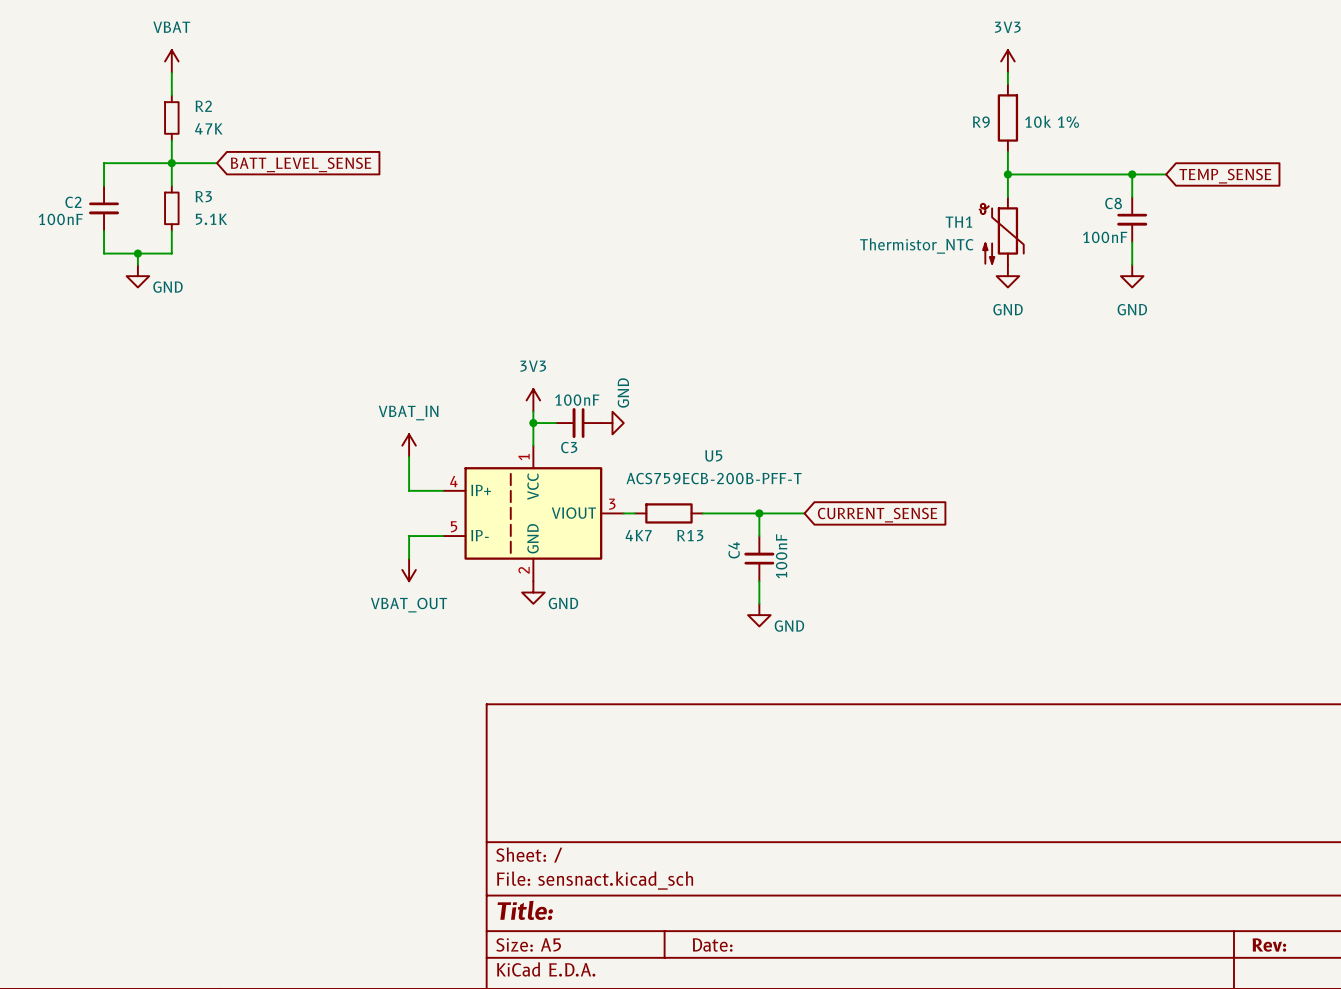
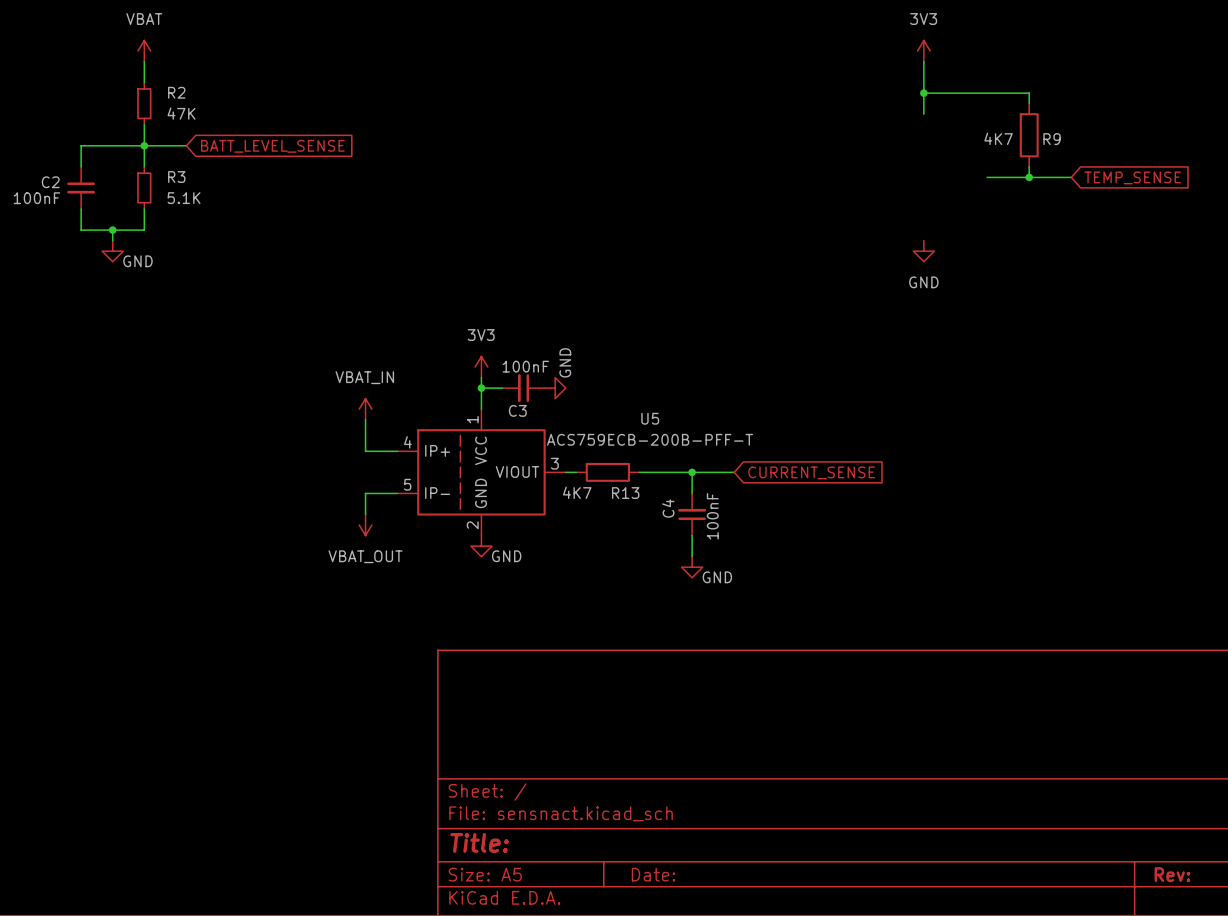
wire: none -> (923, 93) (1029, 93) (1029, 103)
junction: none -> (923, 93)
R9 position: (1007, 117) -> (1029, 135)
R9 value: 10k 1% (1052, 121) -> 4K7 (998, 138)
R9 name position: R9 (981, 122) -> R9 (1052, 139)
wire: (1007, 151) (1007, 197) -> (923, 72) (923, 114)
wire: (1007, 174) (1166, 174) -> none
junction: (1007, 174) -> none
wire: (1132, 174) (1132, 197) -> none
junction position: (1132, 174) -> (1029, 177)
global label position: TEMP_SENSE (1225, 176) -> TEMP_SENSE (1132, 177)
wire: none -> (1029, 166) (1029, 177)
wire: none -> (987, 177) (1071, 177)
C8: 100nF (1132, 219) -> none
TH1: Thermistor_NTC (1001, 230) -> none
wire: (1132, 242) (1132, 264) -> none
power symbol: GND (1132, 276) -> none

